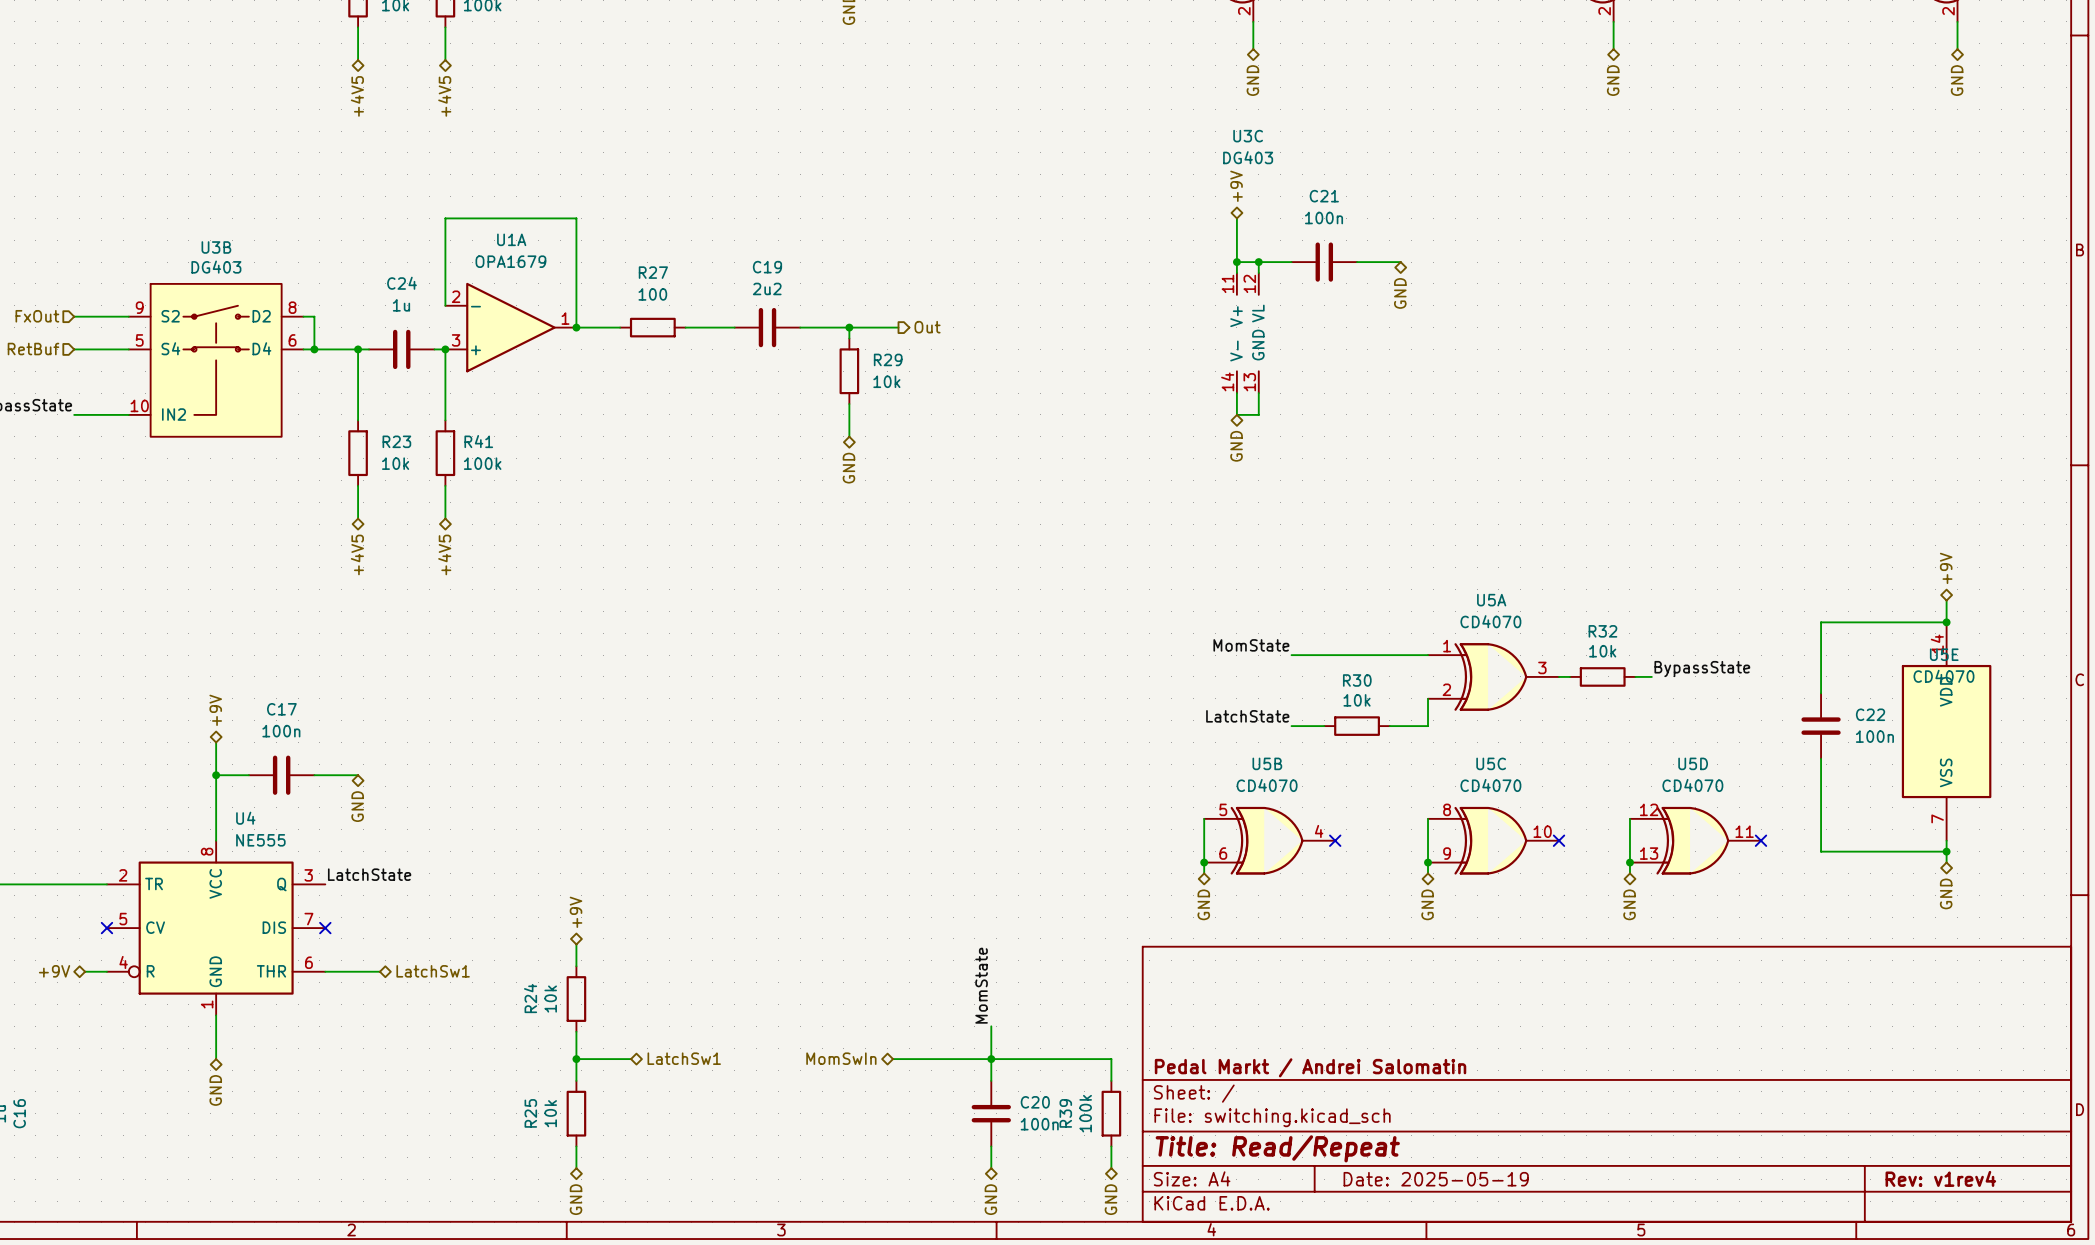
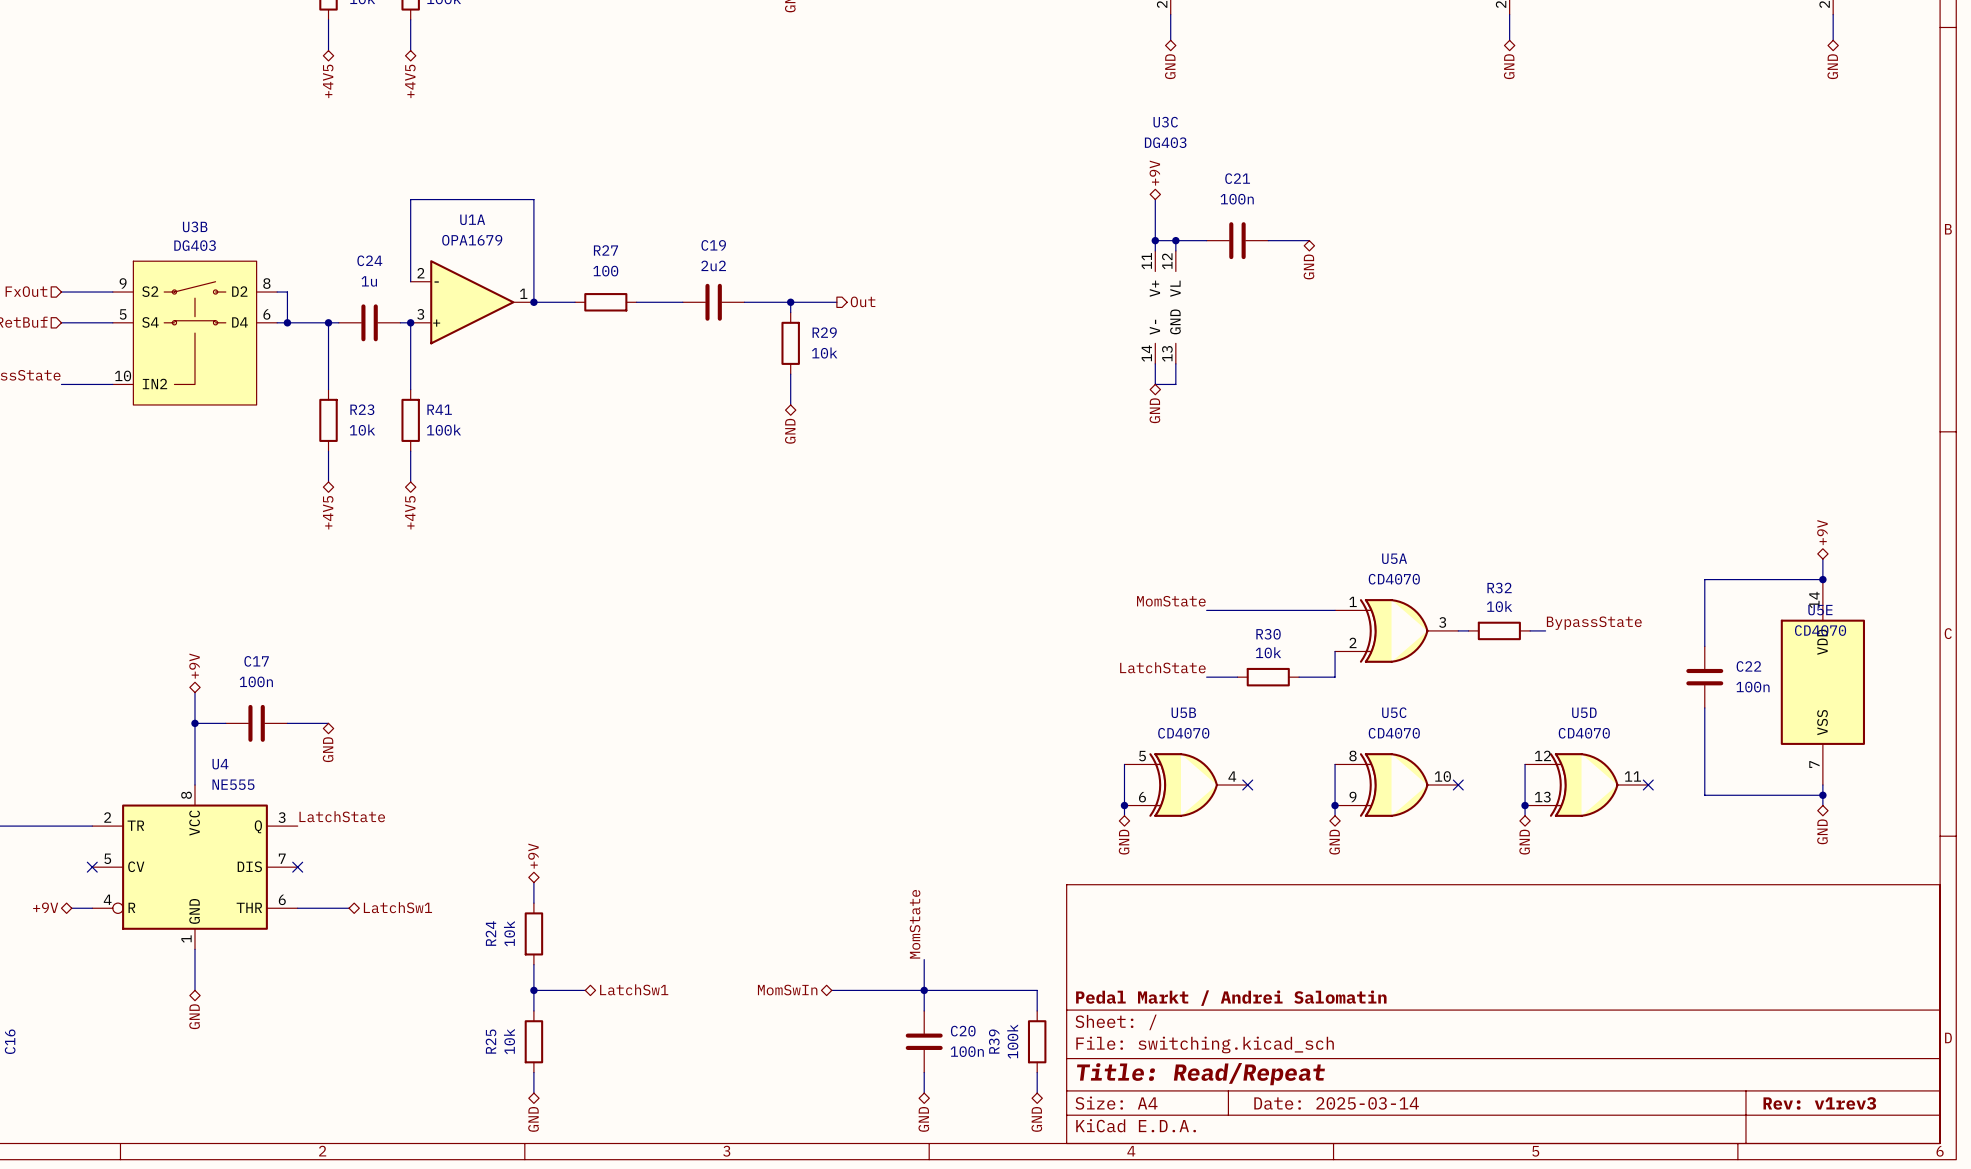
title block: Rev: v1rev4 (1940, 1178) -> Rev: v1rev3 (1819, 1103)
title block: Date: 2025-05-19 (1436, 1179) -> Date: 2025-03-14 (1336, 1103)

